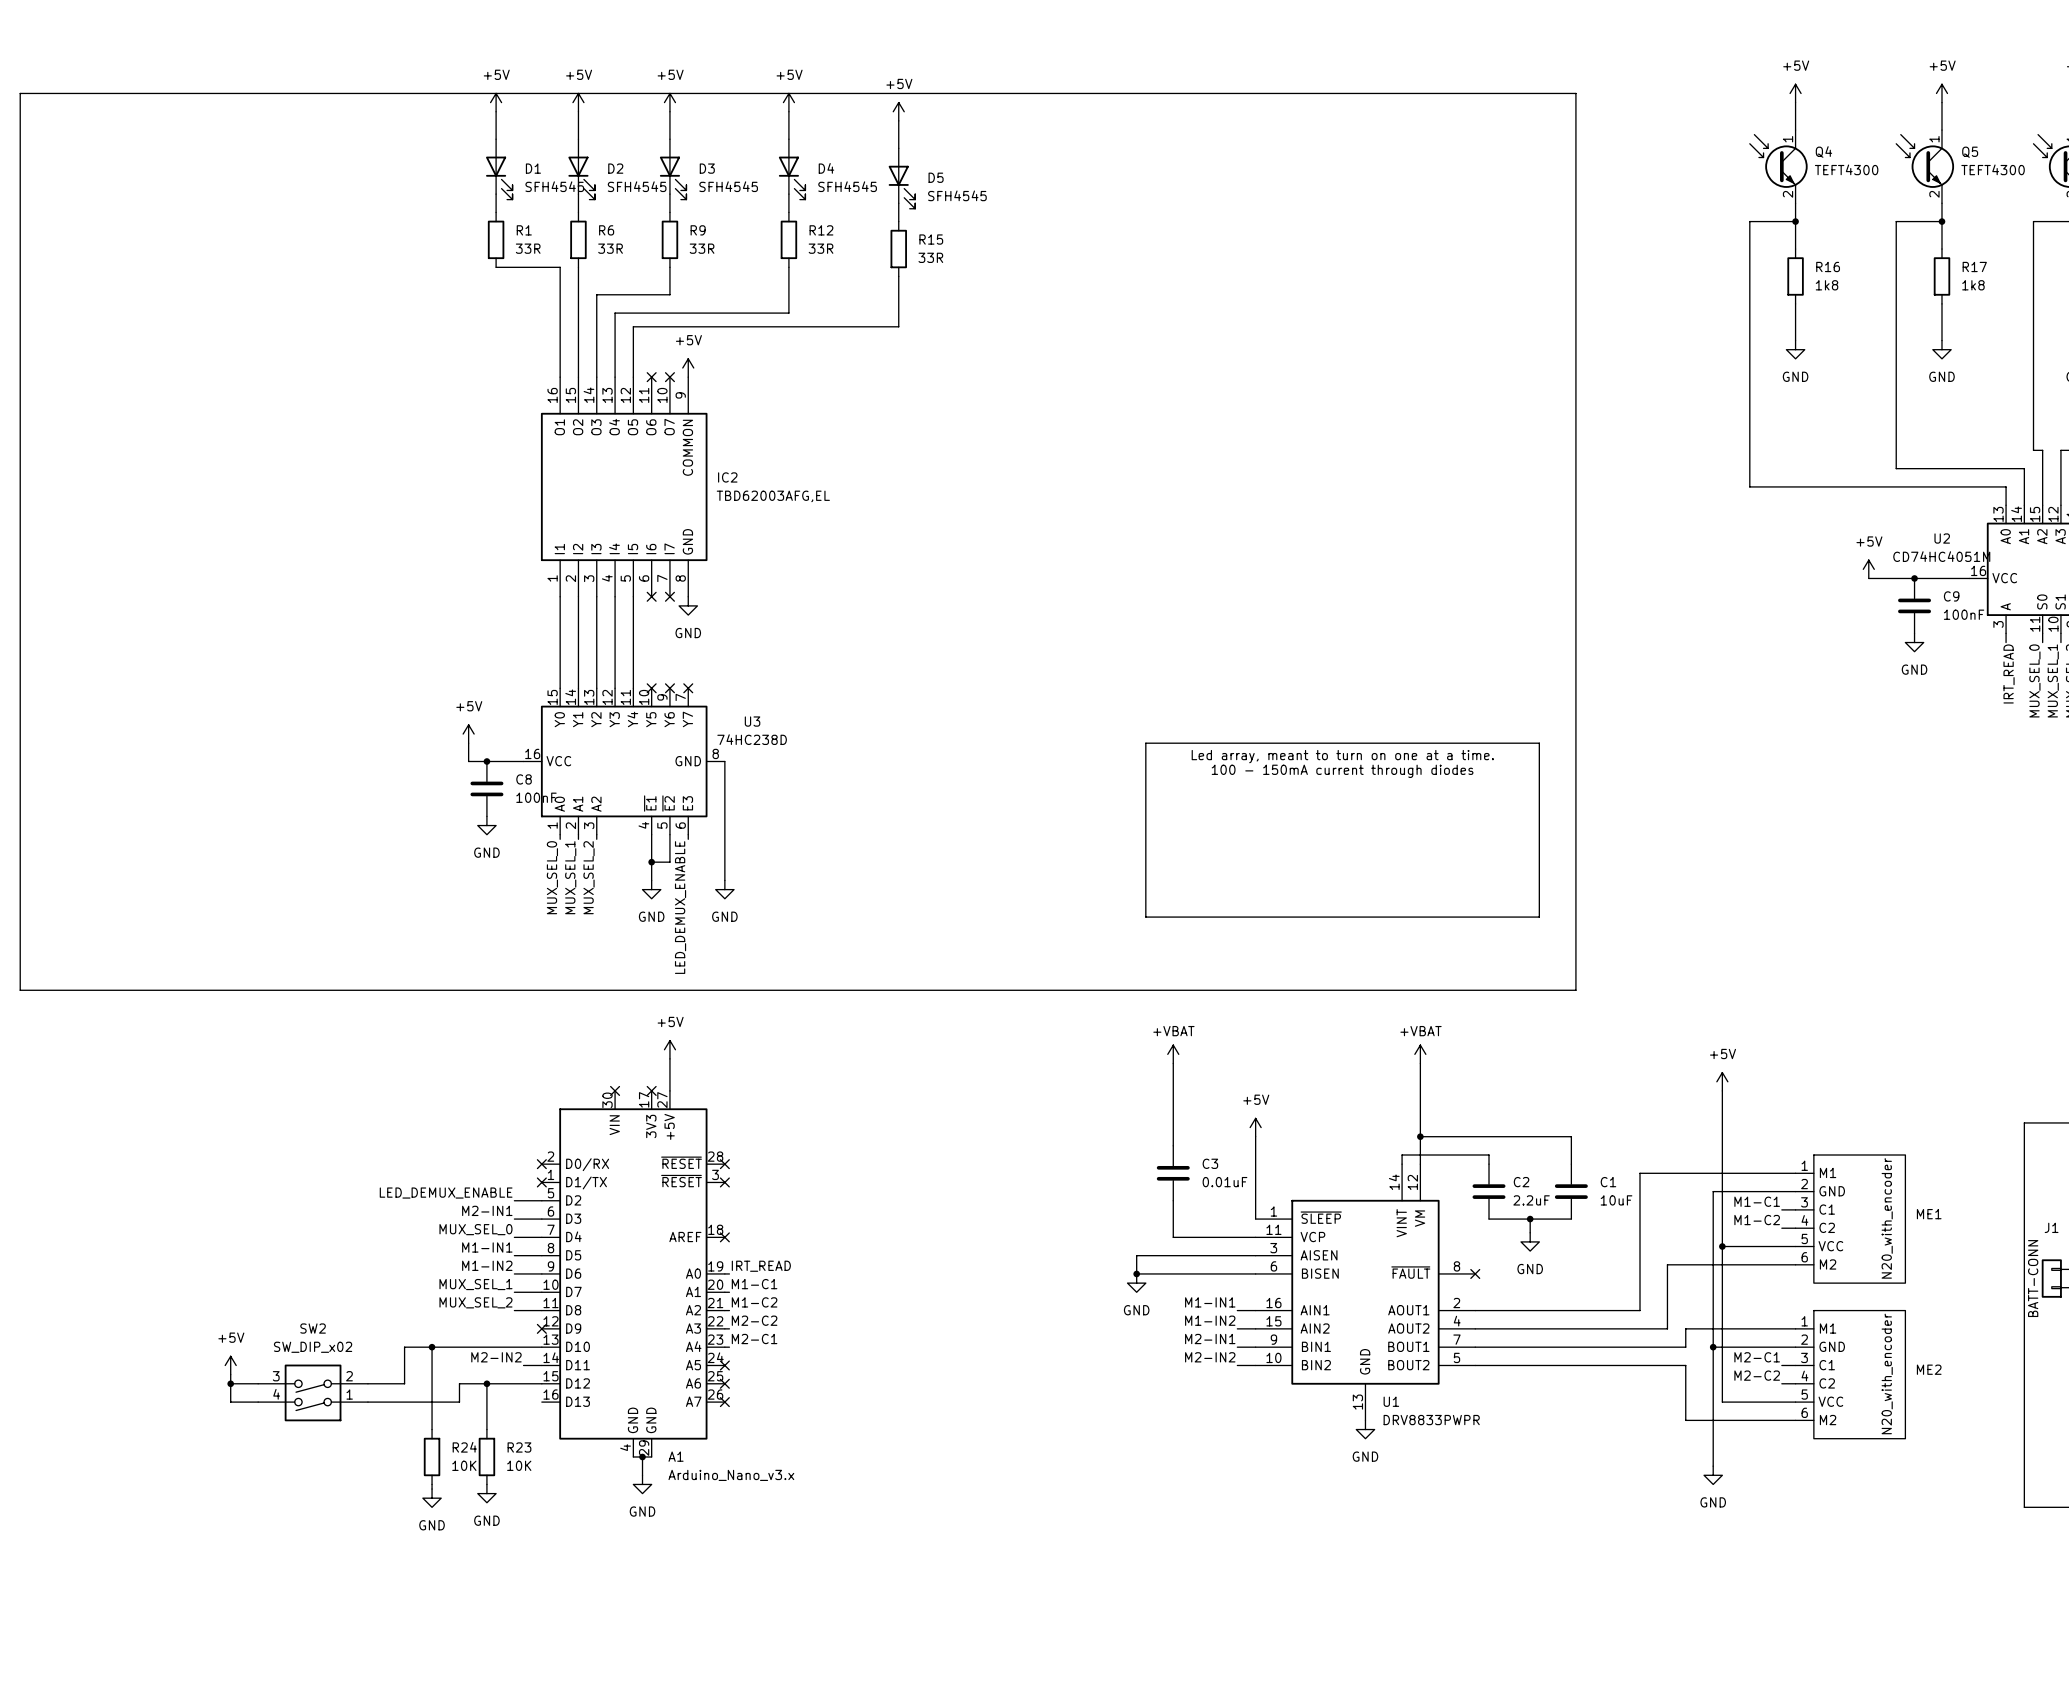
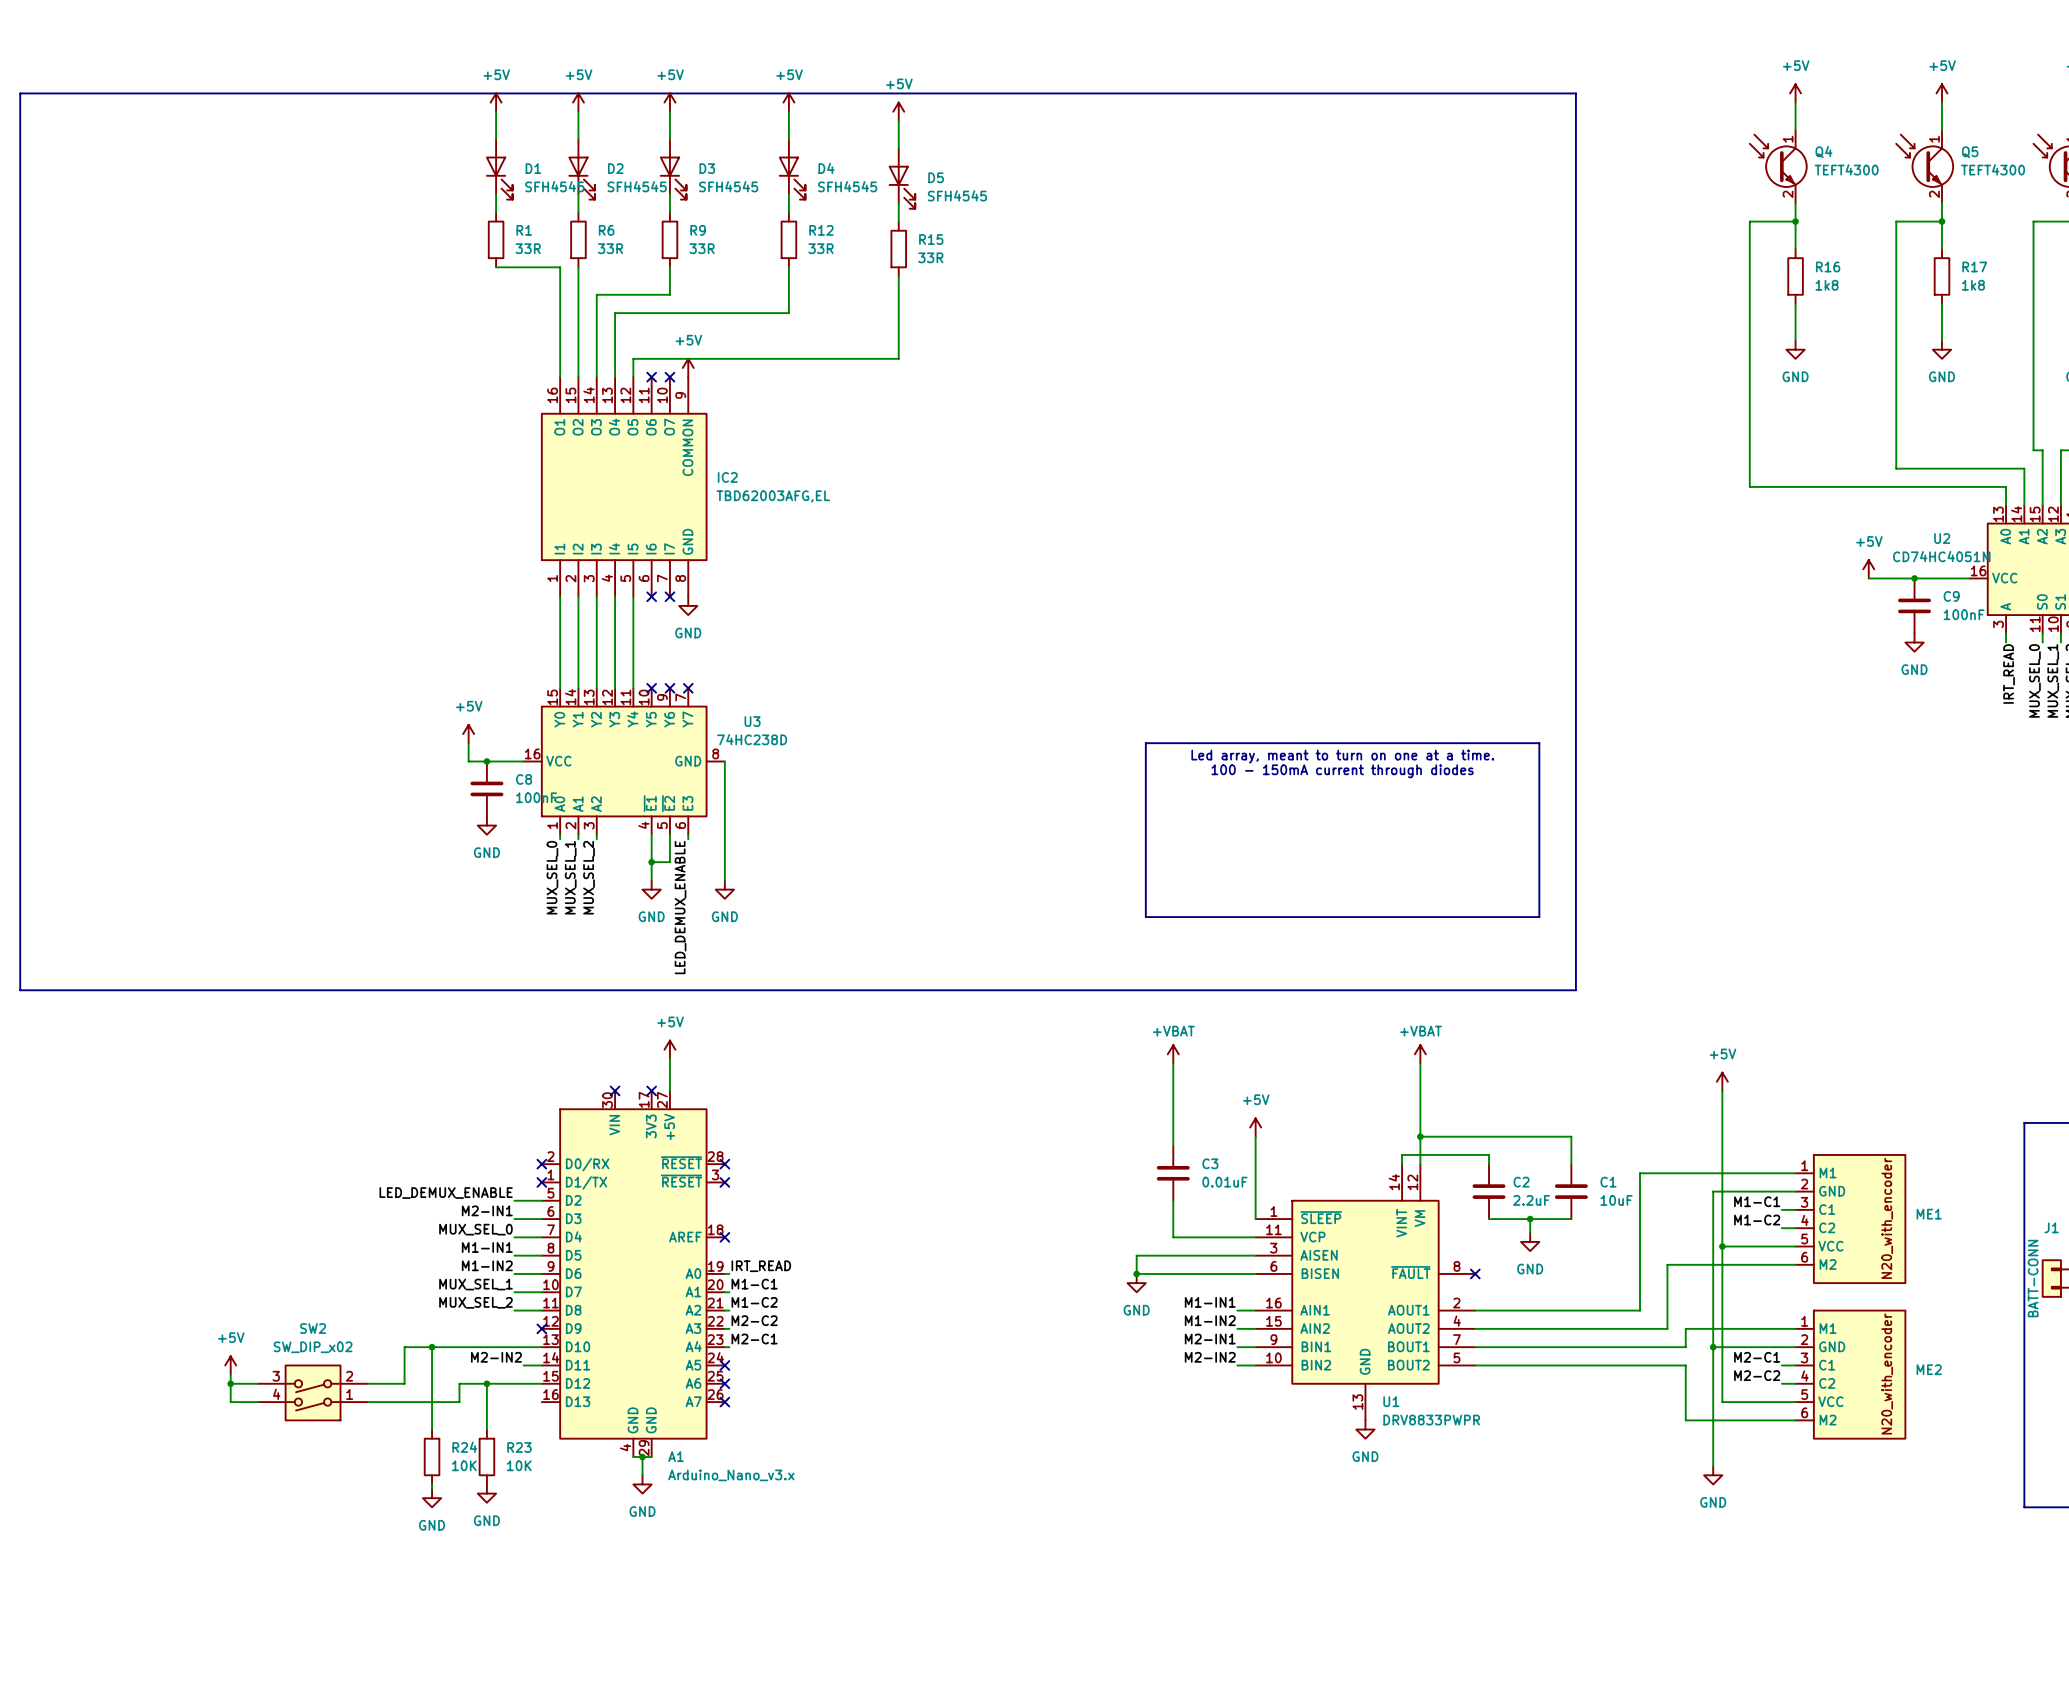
wire: (898, 326) (633, 326) (633, 358) -> (898, 326) (898, 358) (633, 358)

